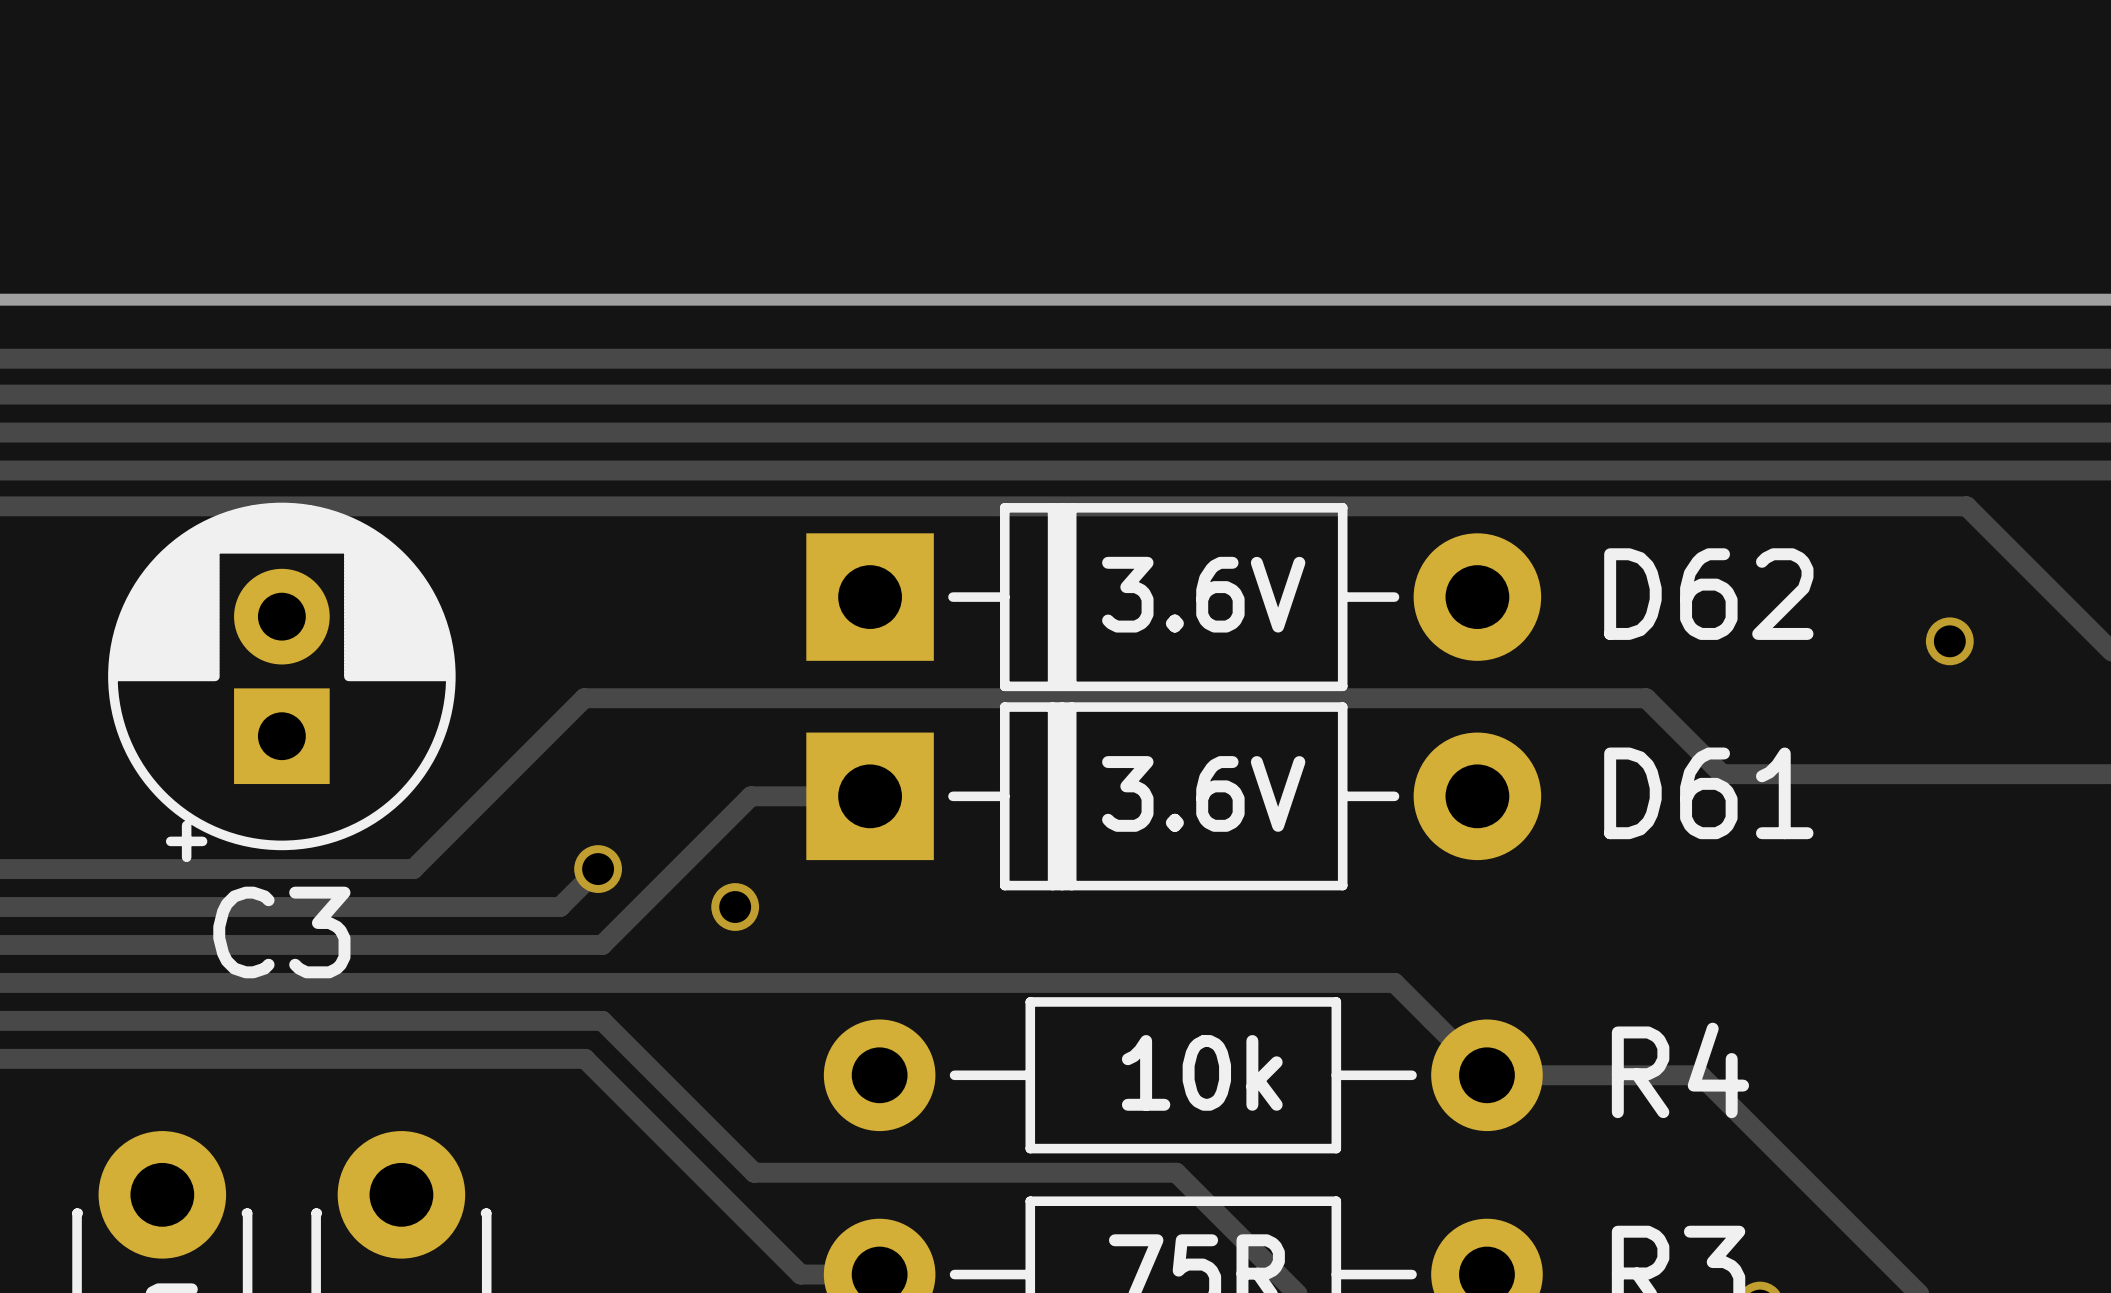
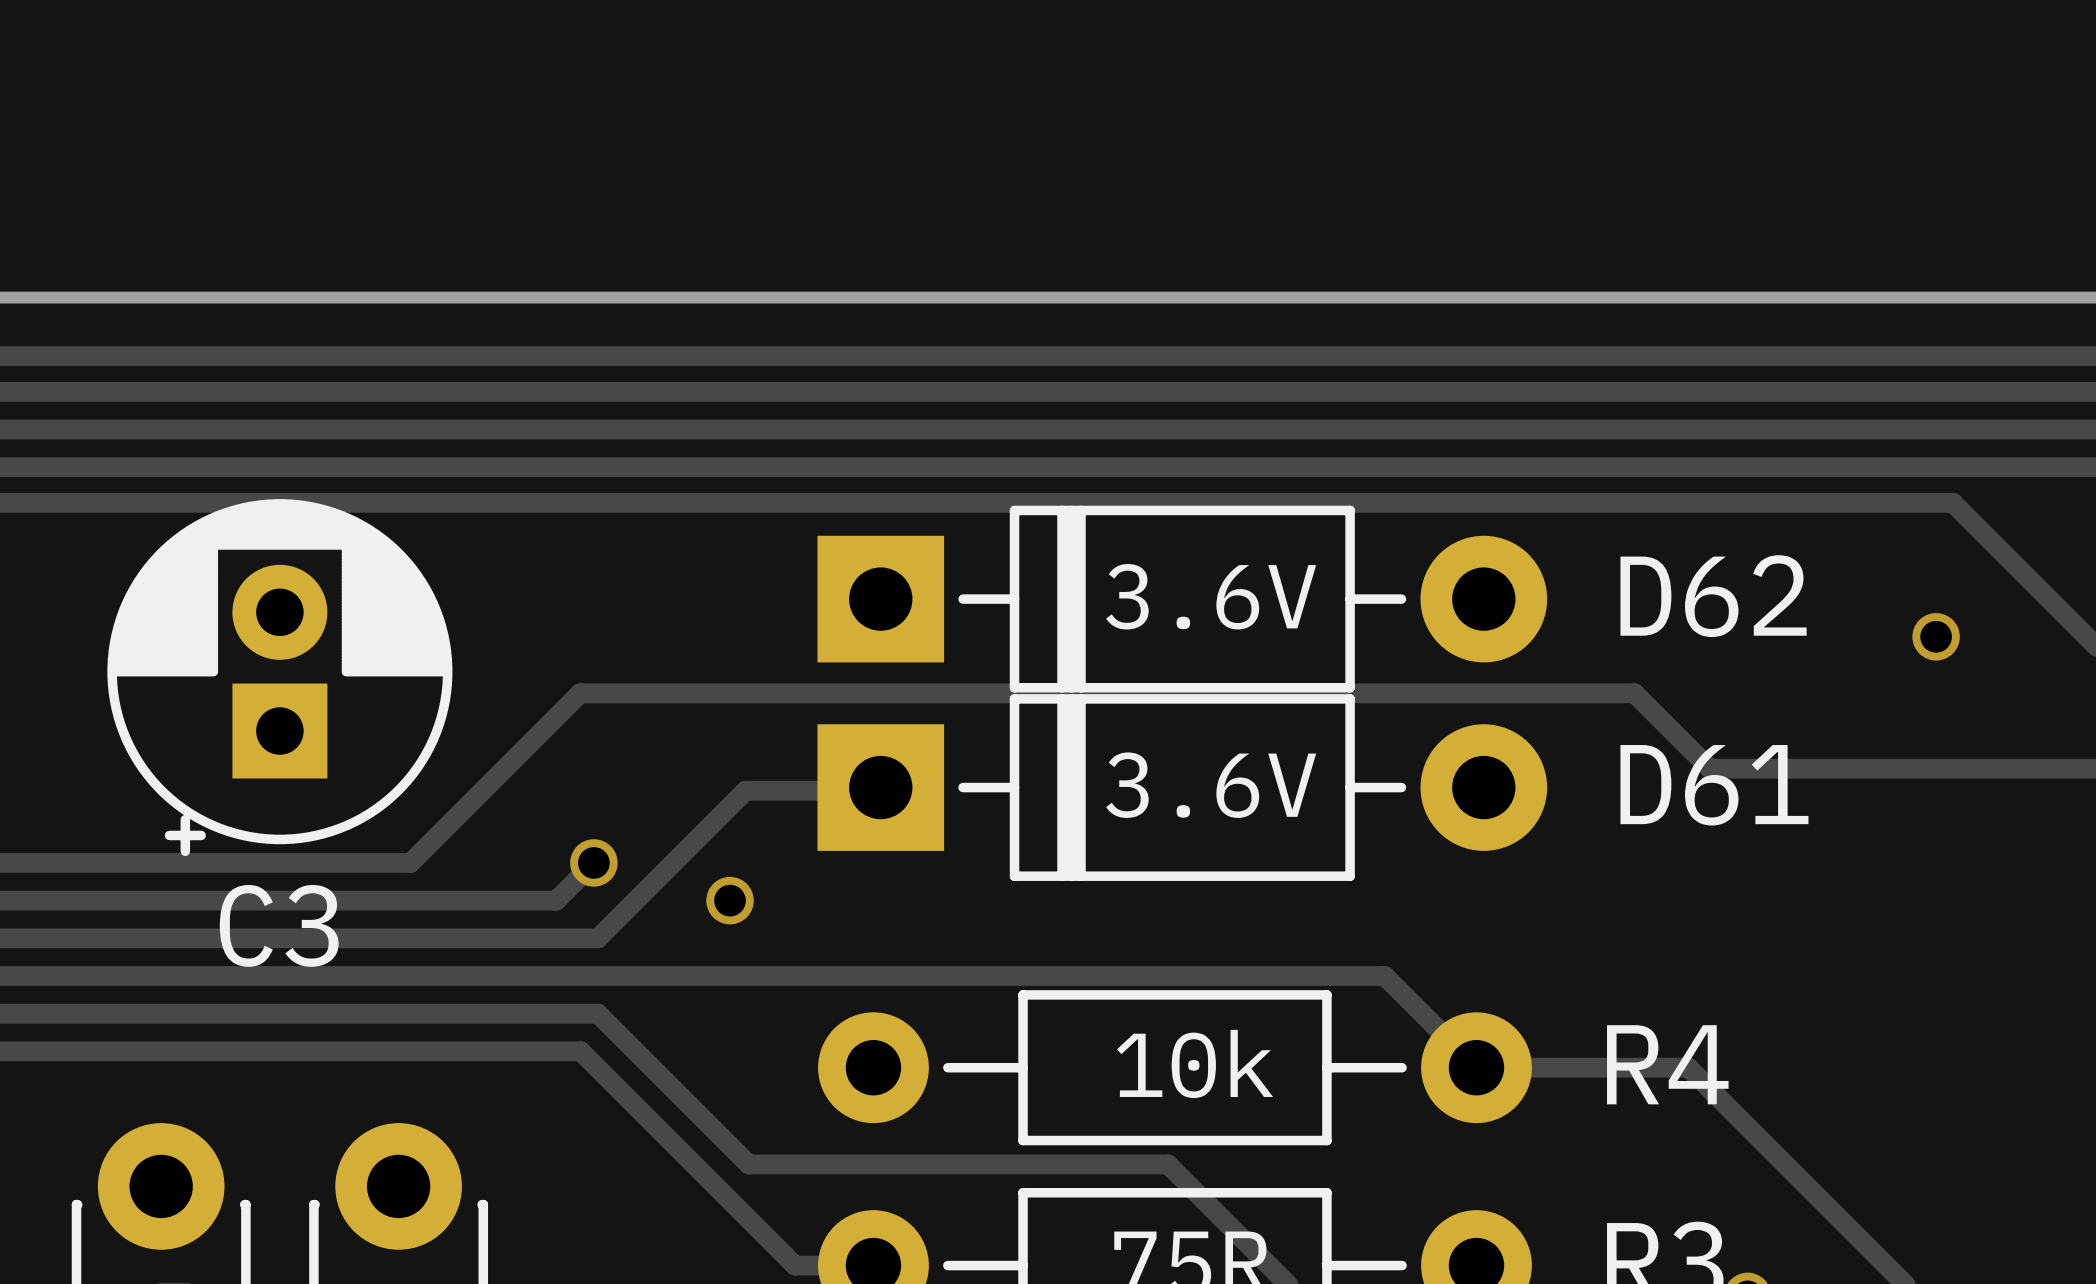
D62 position: (1173, 597) -> (1182, 599)
D61 position: (1173, 796) -> (1182, 787)

